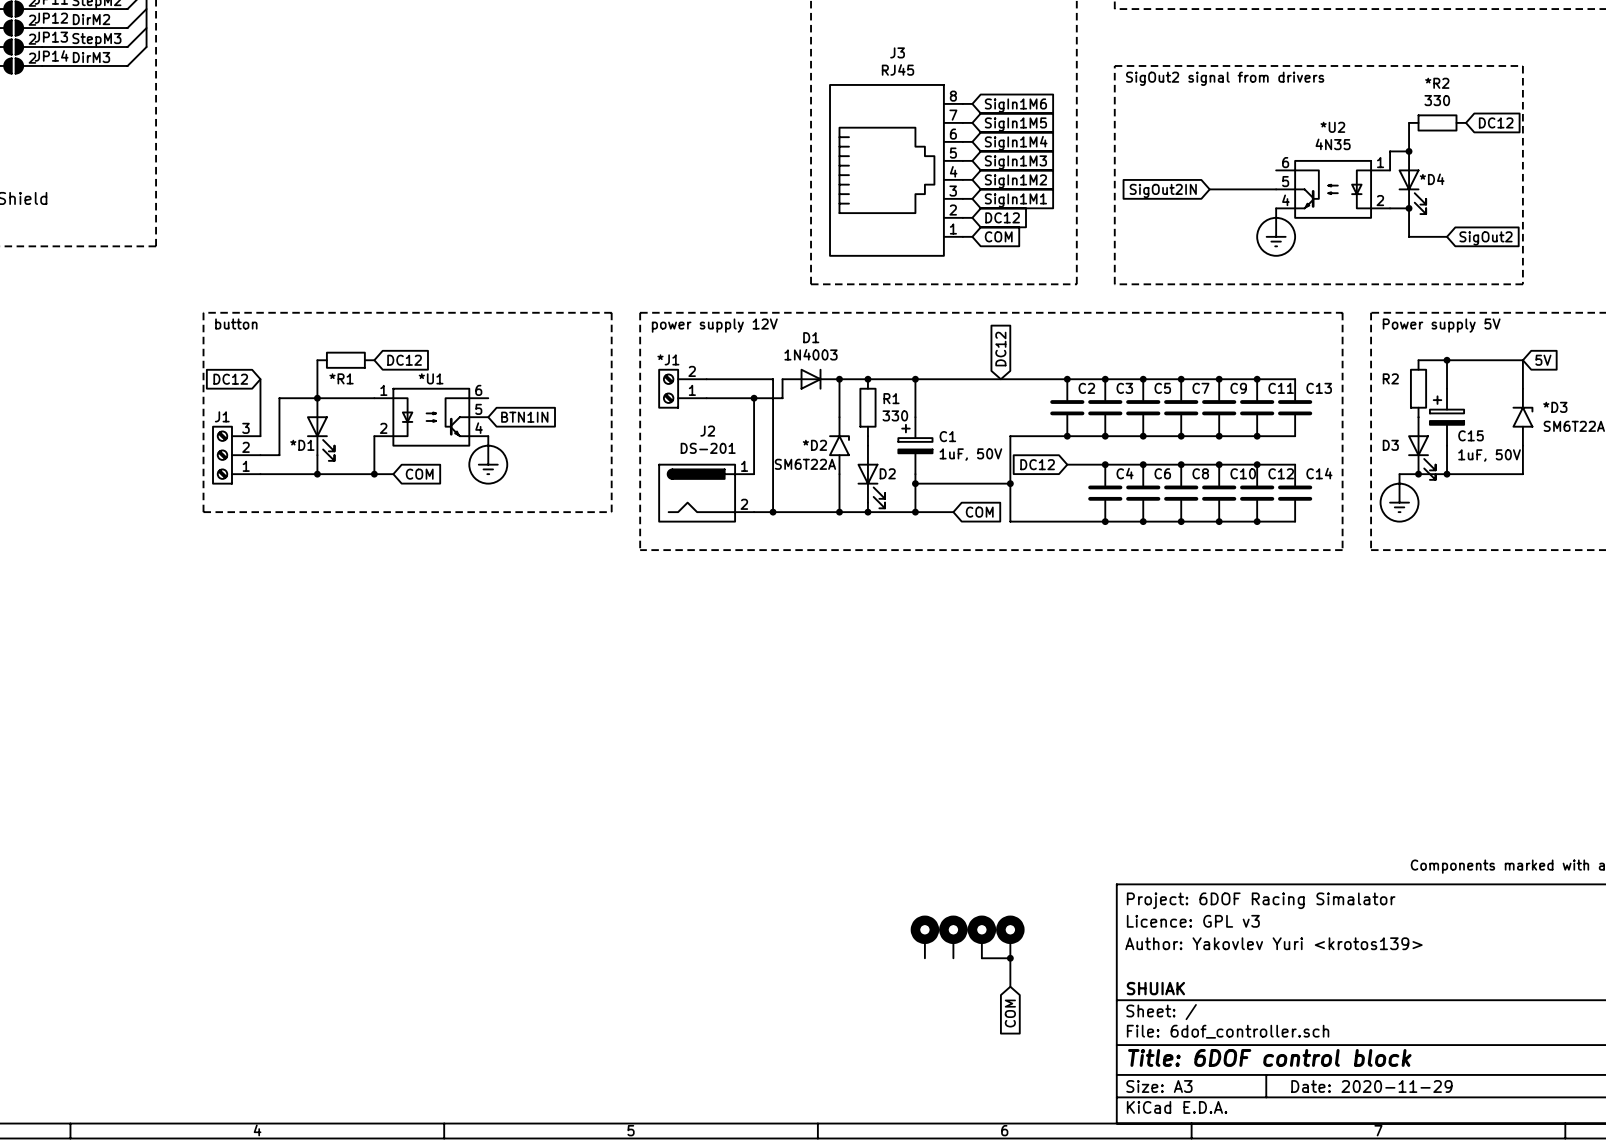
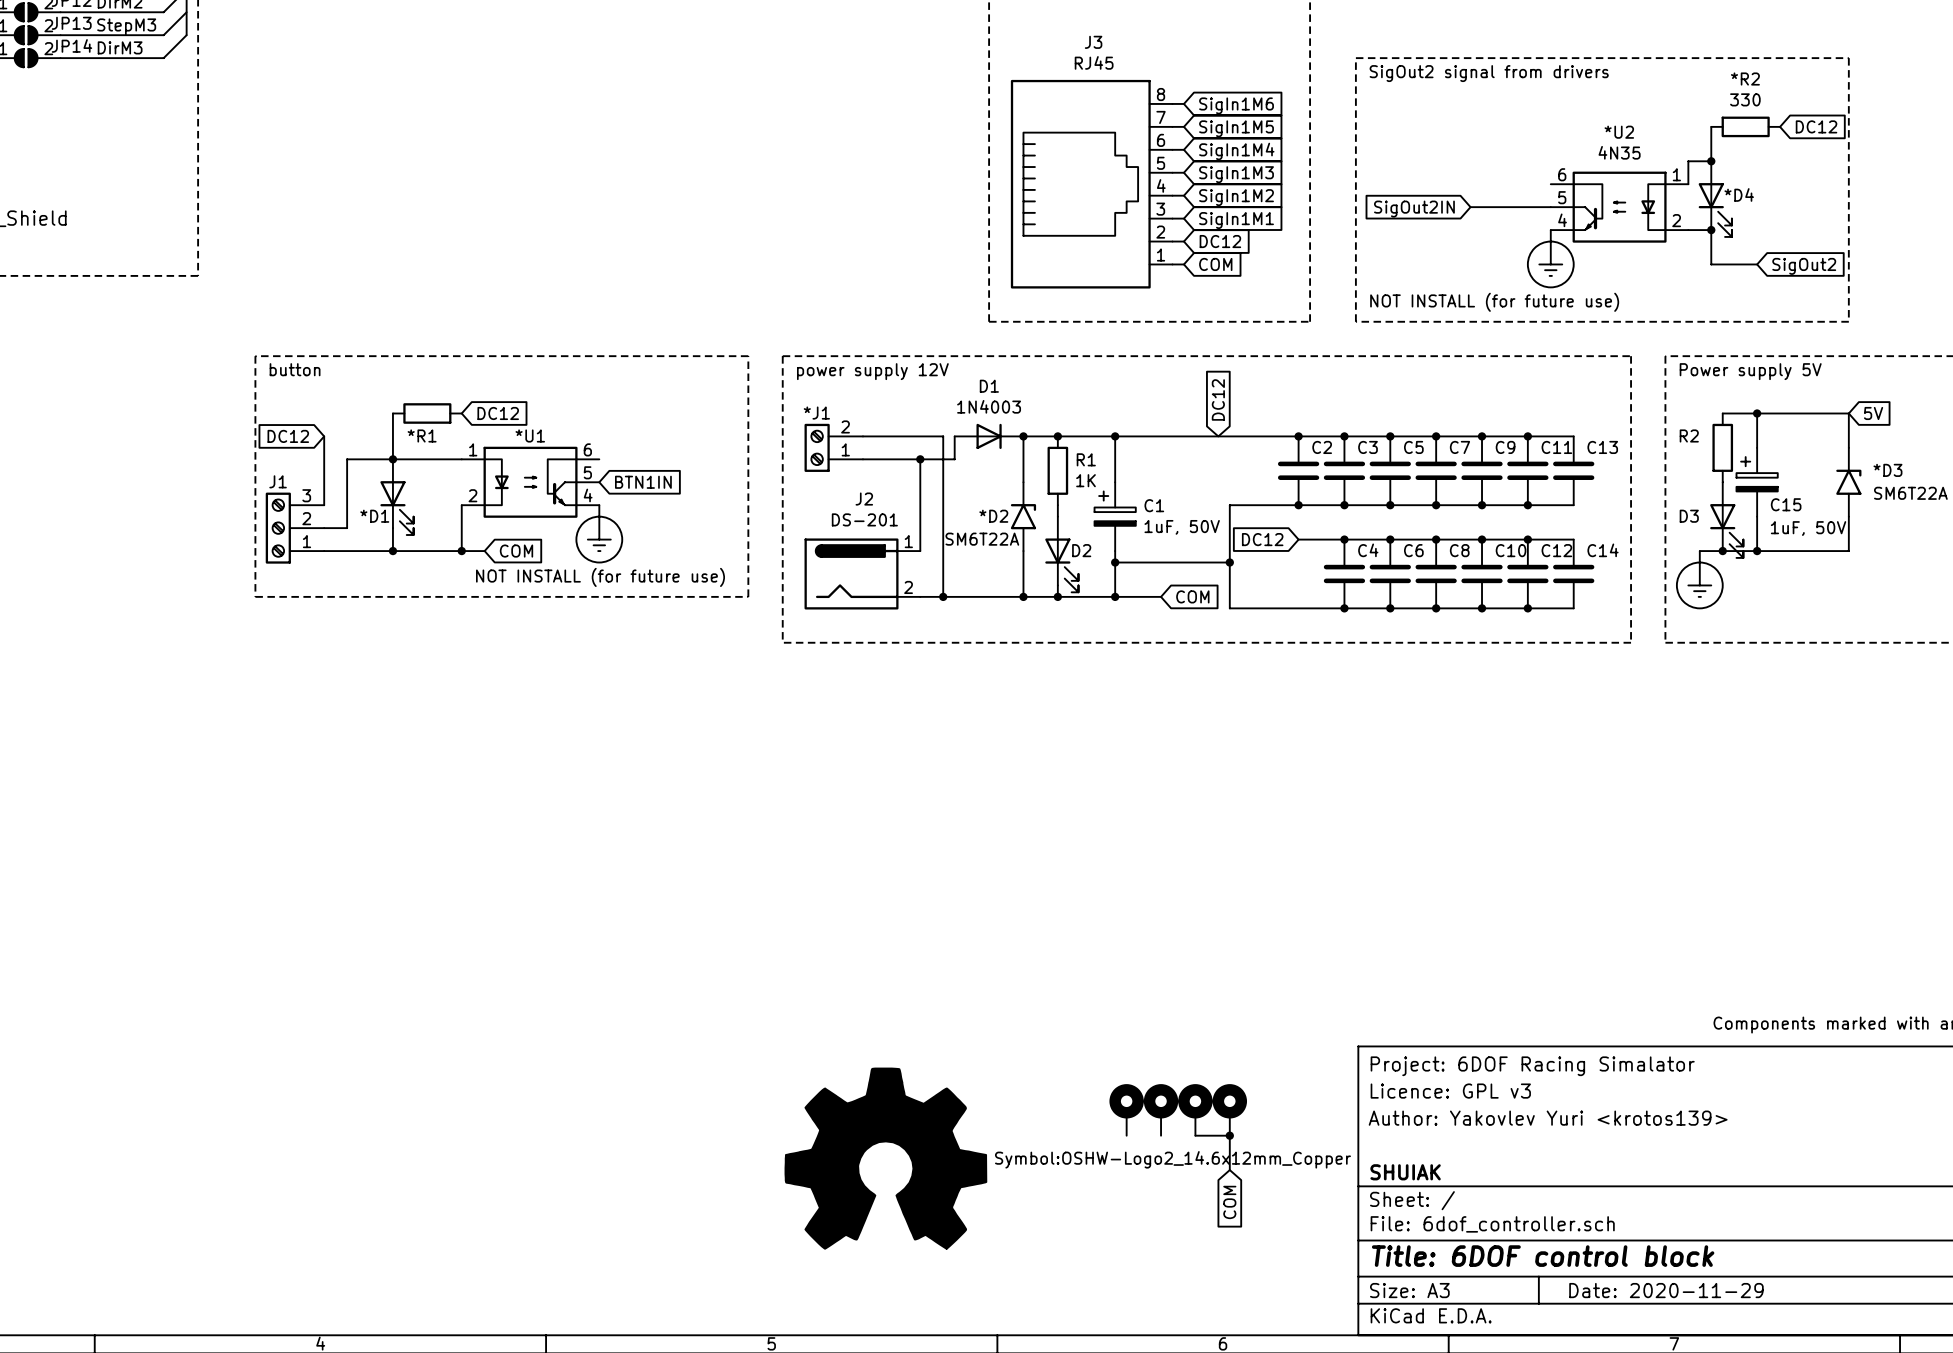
text: none -> NOT INSTALL (for future use) (1494, 302)
R1 value: 330 (895, 415) -> 1K (1086, 480)
text: none -> NOT INSTALL (for future use) (600, 577)
part: none -> (885, 1158)

